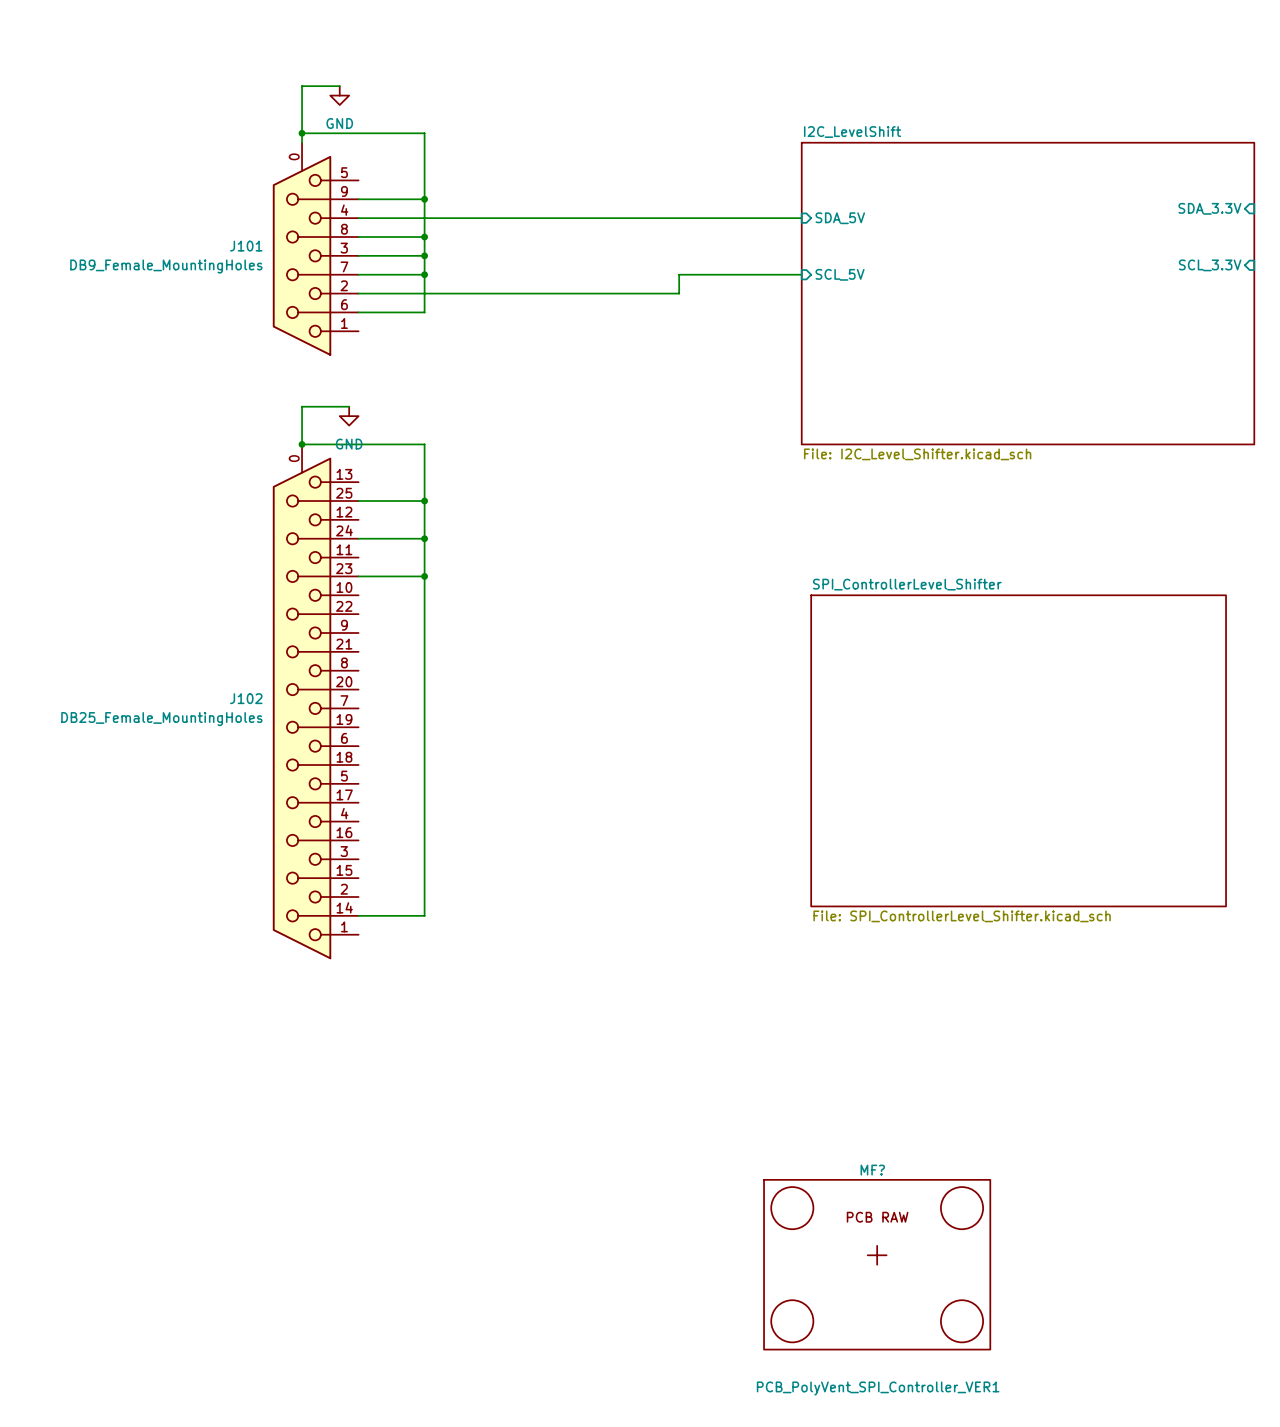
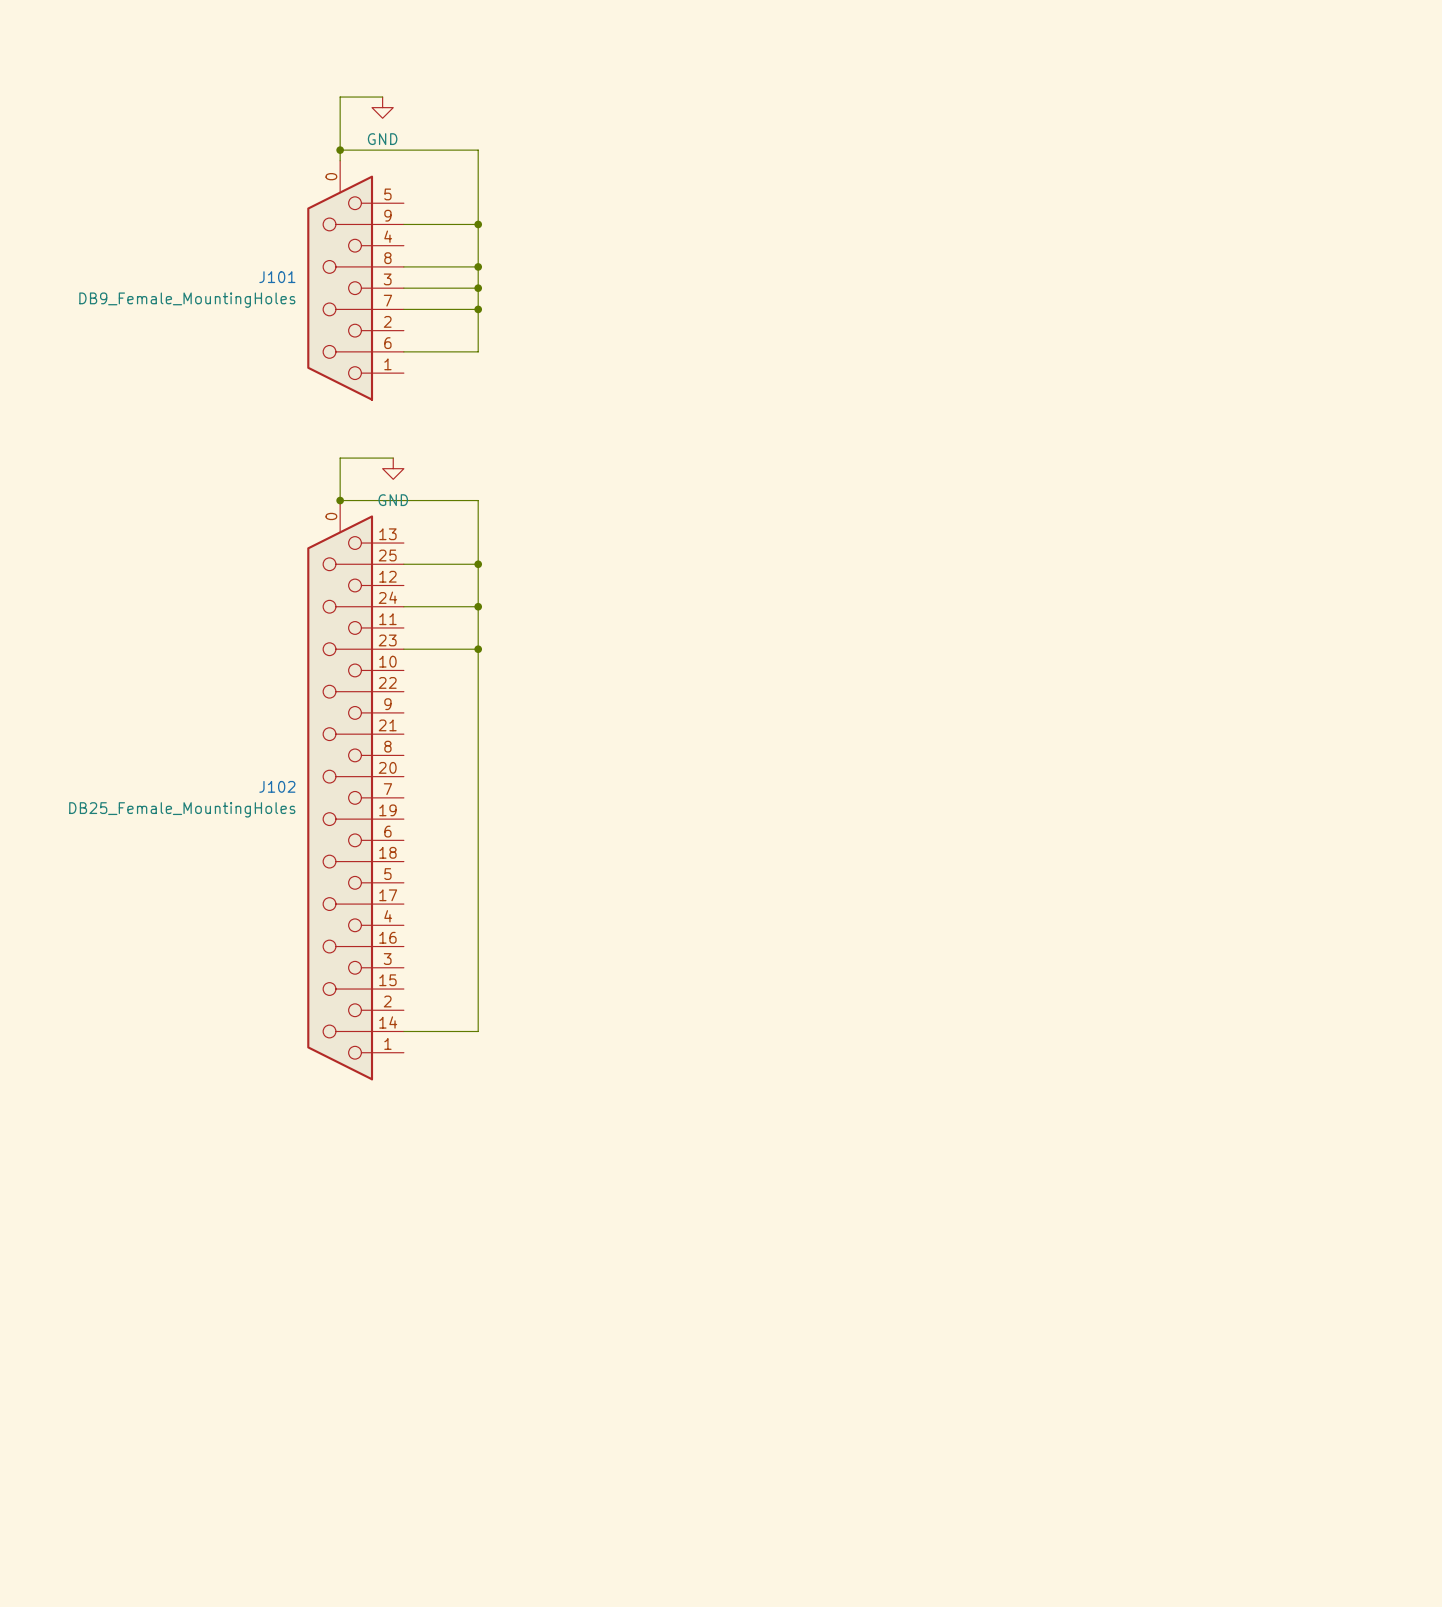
sheet pin: SDA_3.3V (1209, 208) -> none
wire: (358, 218) (801, 218) -> none
sheet pin: SDA_5V (840, 218) -> none
sheet pin: SCL_3.3V (1210, 265) -> none
wire: (801, 274) (679, 274) (679, 293) (358, 293) -> none
sheet pin: SCL_5V (840, 274) -> none
sheet I2C_LevelShift: File: I2C_Level_Shifter.kicad_sch (1028, 293) -> none
sheet SPI_ControllerLevel_Shifter: File: SPI_ControllerLevel_Shifter.kicad_sch (1018, 750) -> none
MF?: PCB_PolyVent_SPI_Controller_VER1 (877, 1264) -> none

